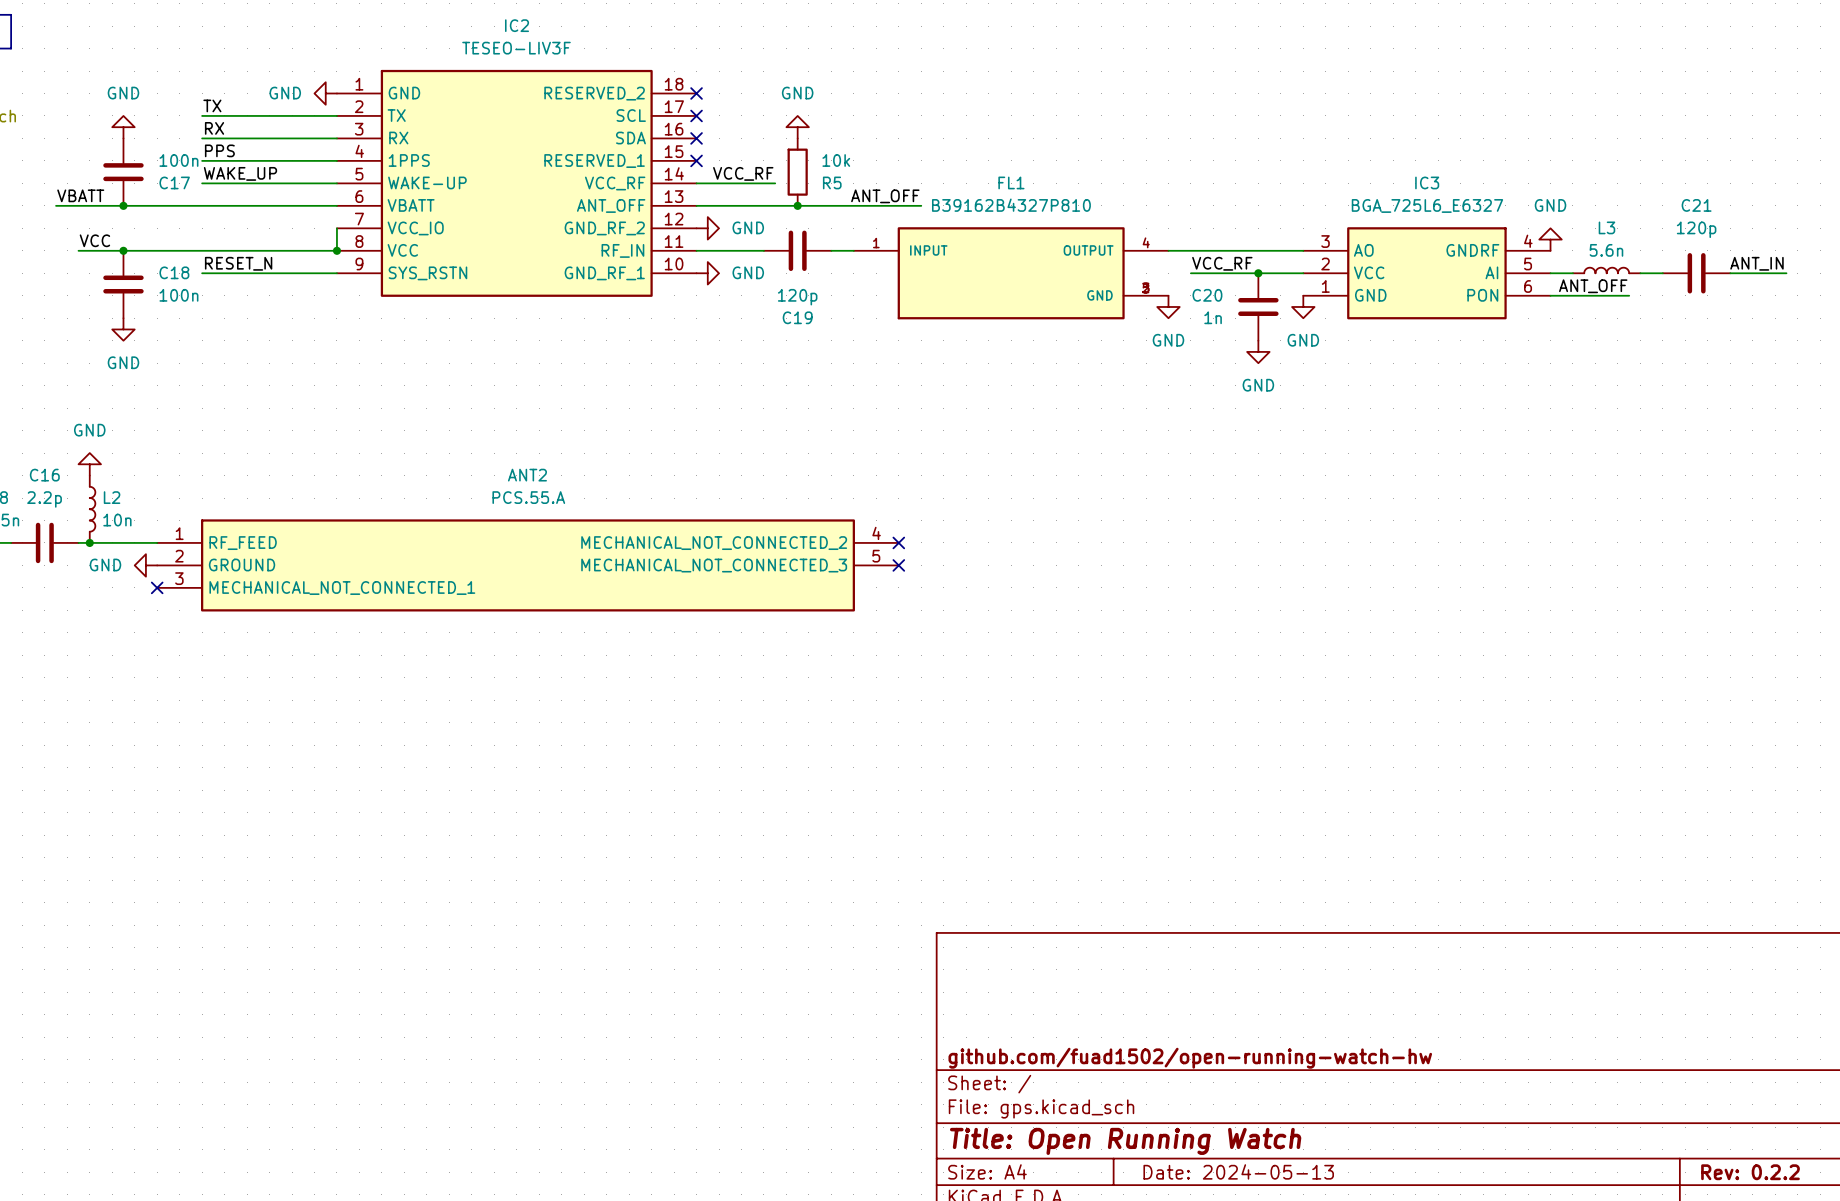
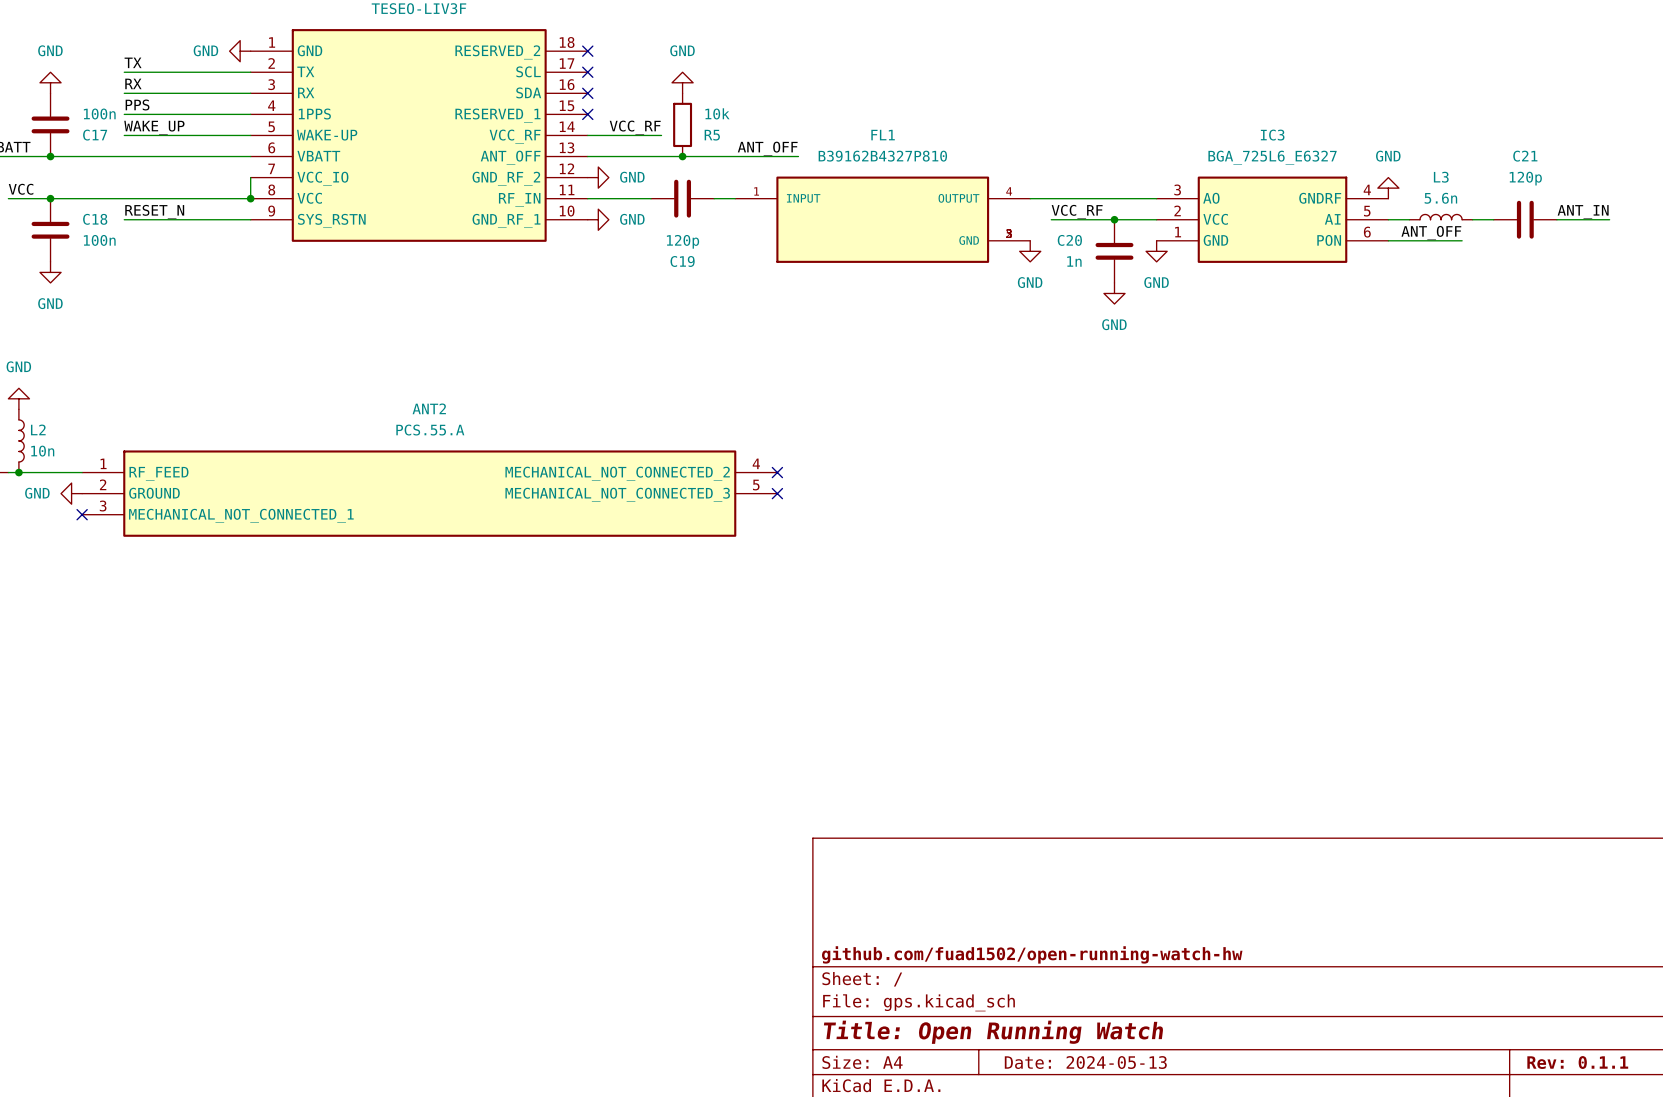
title block: Rev: 0.2.2 (1750, 1172) -> Rev: 0.1.1 (1577, 1062)

